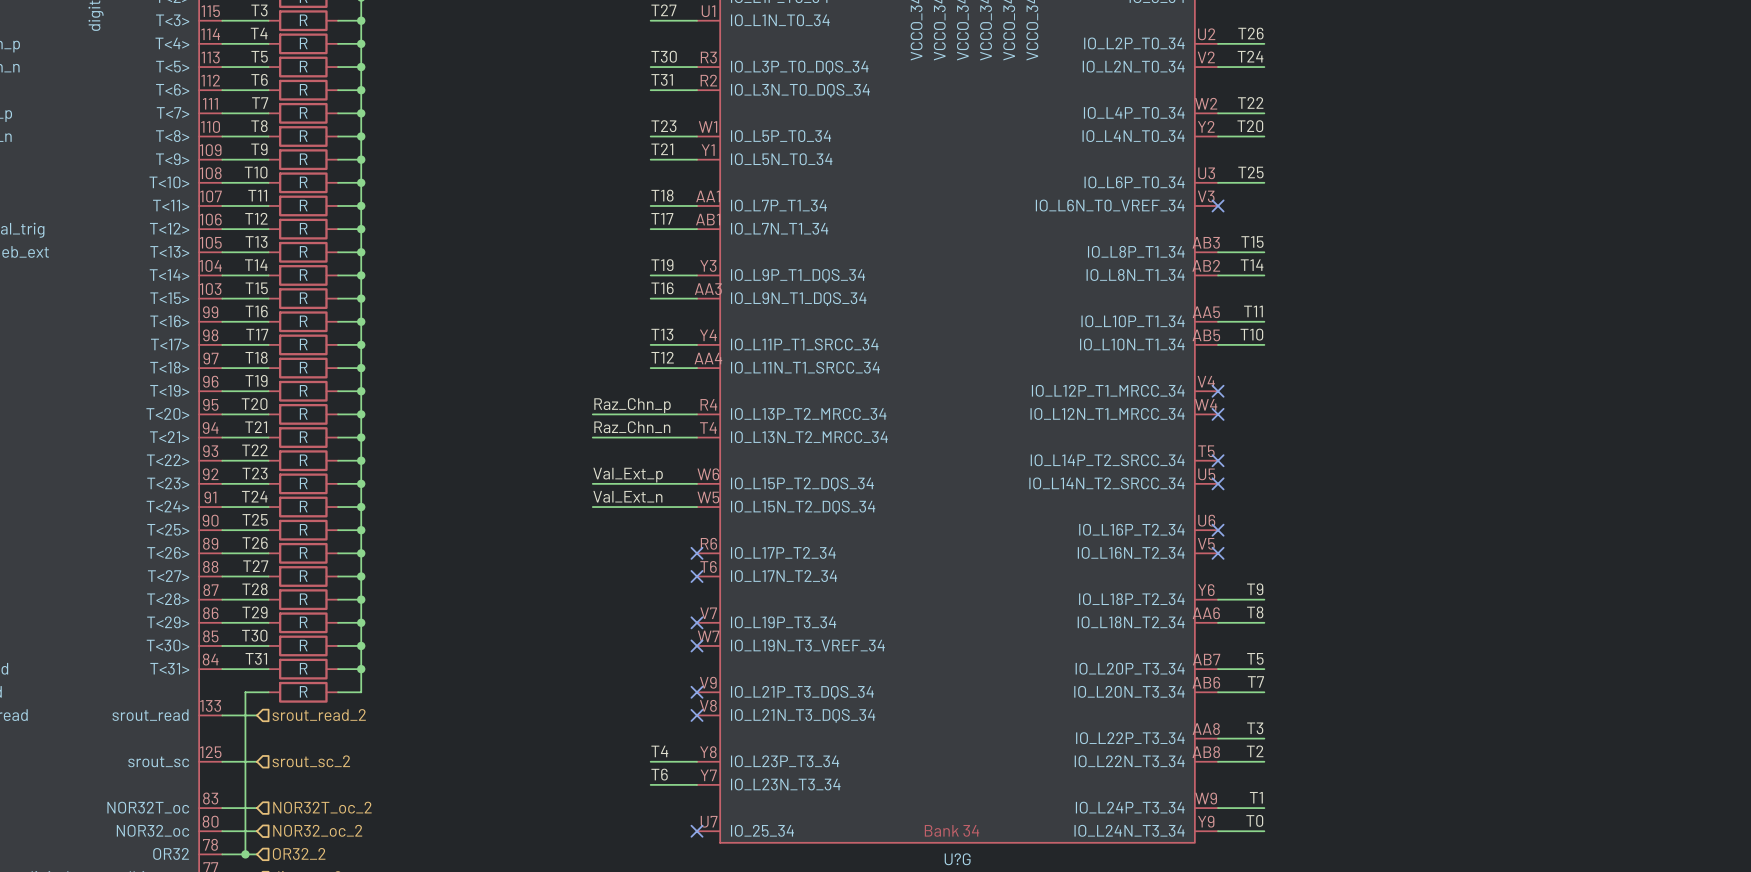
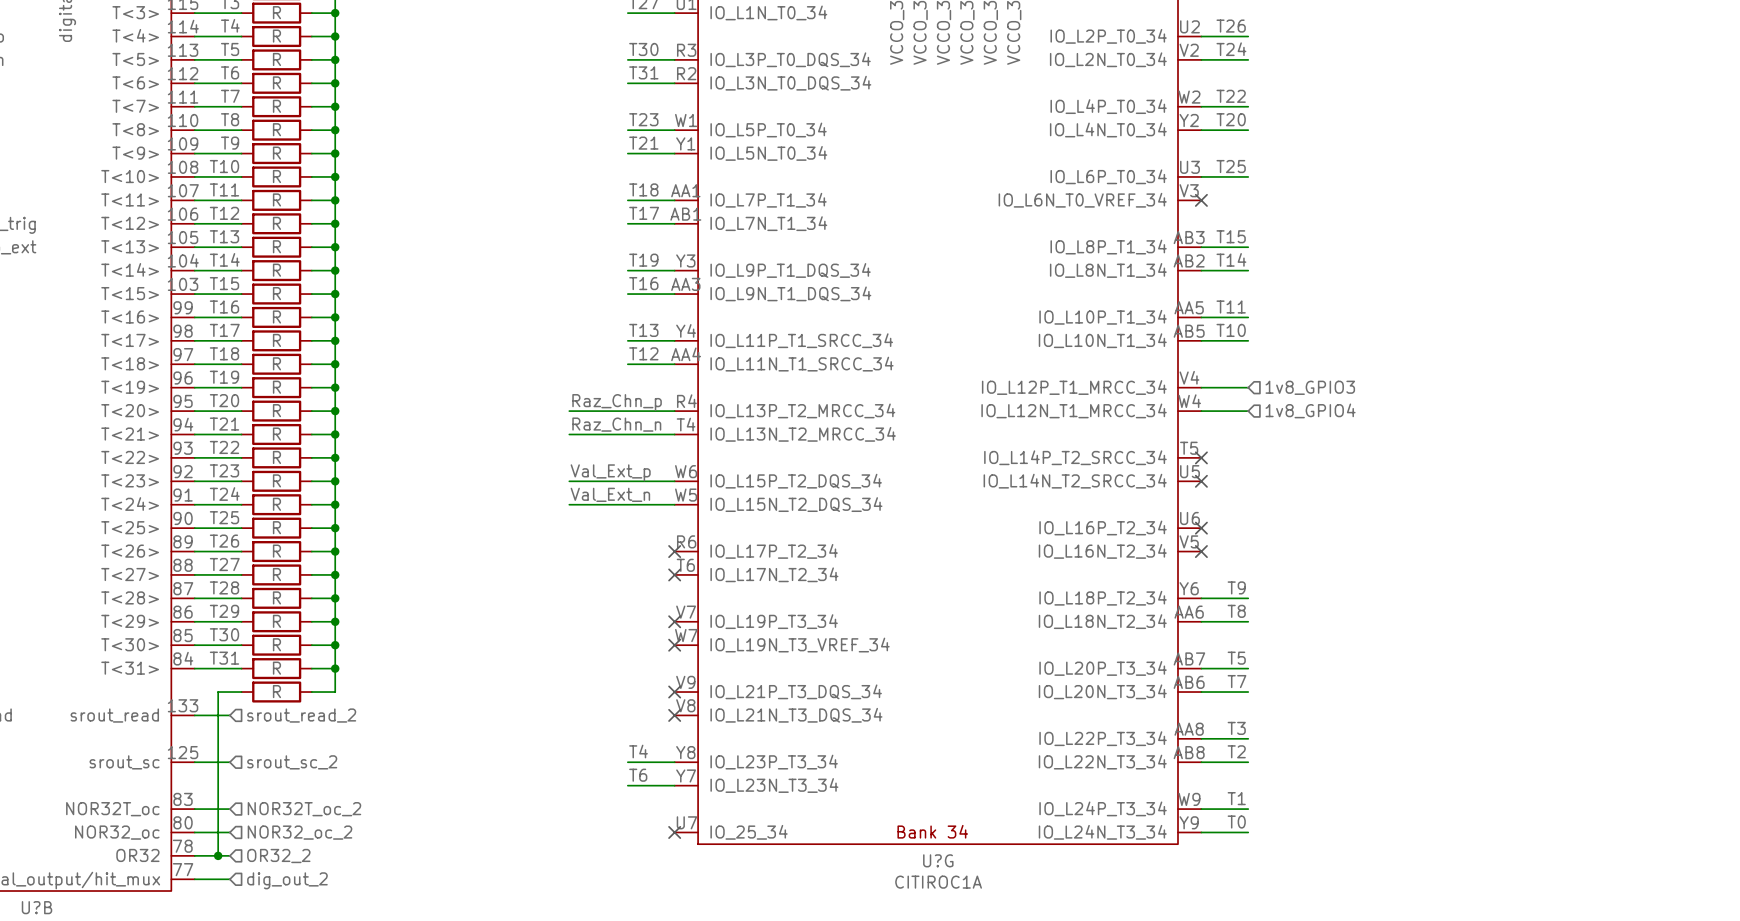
hierarchical label: none -> 1v8_GPIO3 (1310, 387)
wire: none -> (1201, 387) (1248, 387)
no-connect mark: (1218, 391) -> none
hierarchical label: none -> 1v8_GPIO4 (1310, 410)
wire: none -> (1201, 411) (1248, 411)
no-connect mark: (1218, 414) -> none

